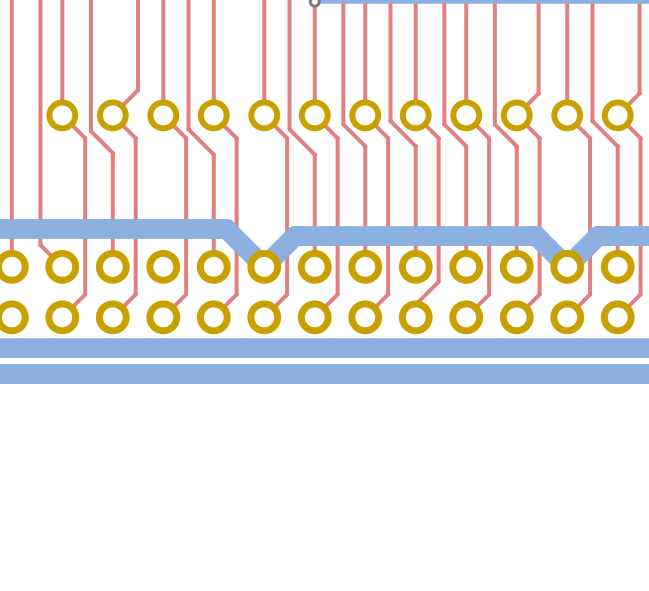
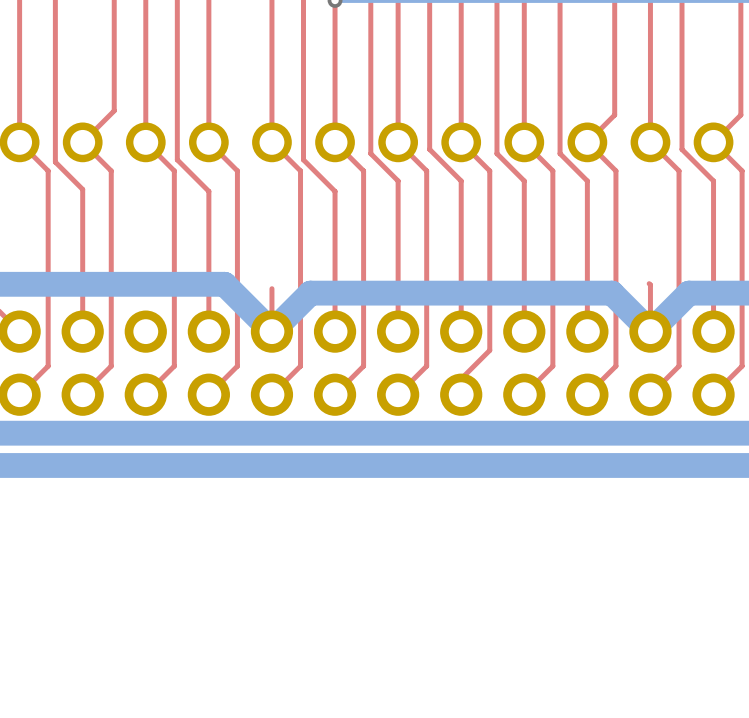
top track: none -> (649, 283) (650, 331)
top track: none -> (271, 288) (271, 331)

